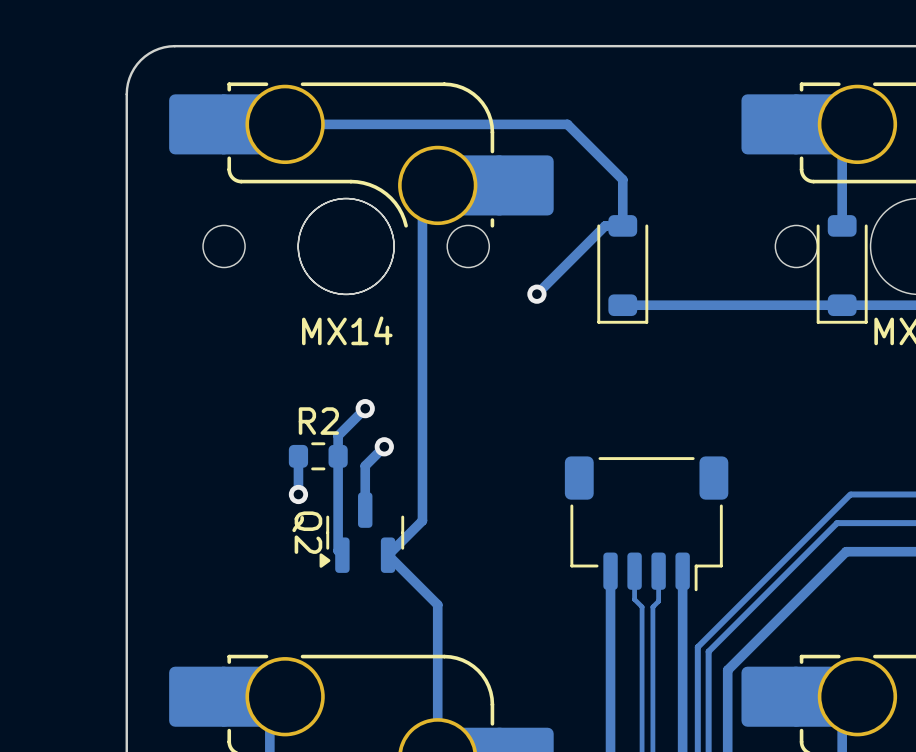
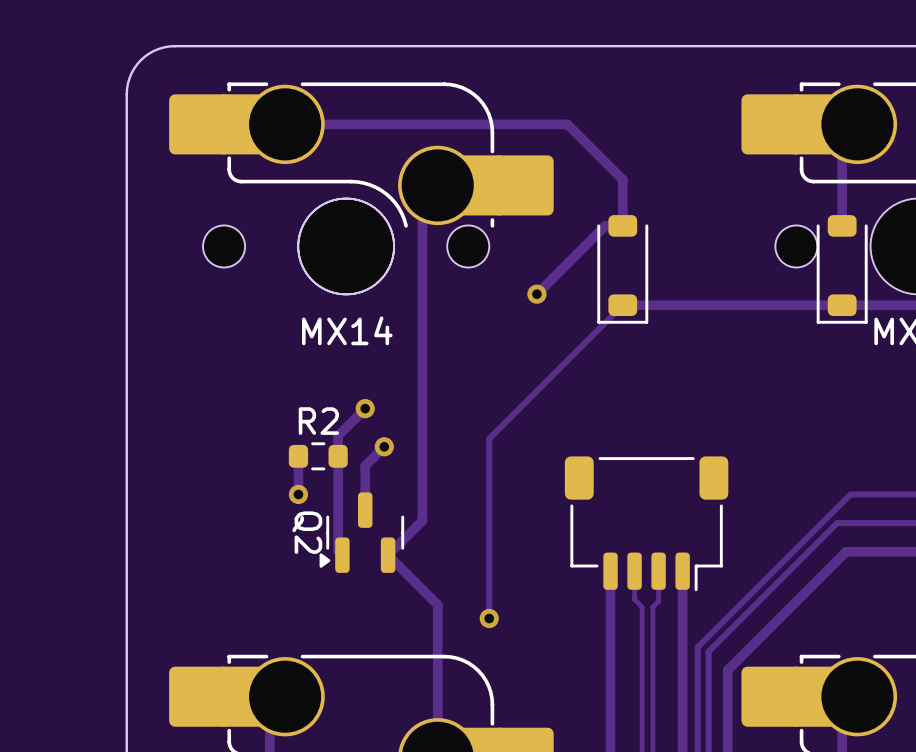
track: none -> (622, 305) (489, 438) (489, 618)
via: none -> (489, 618)

